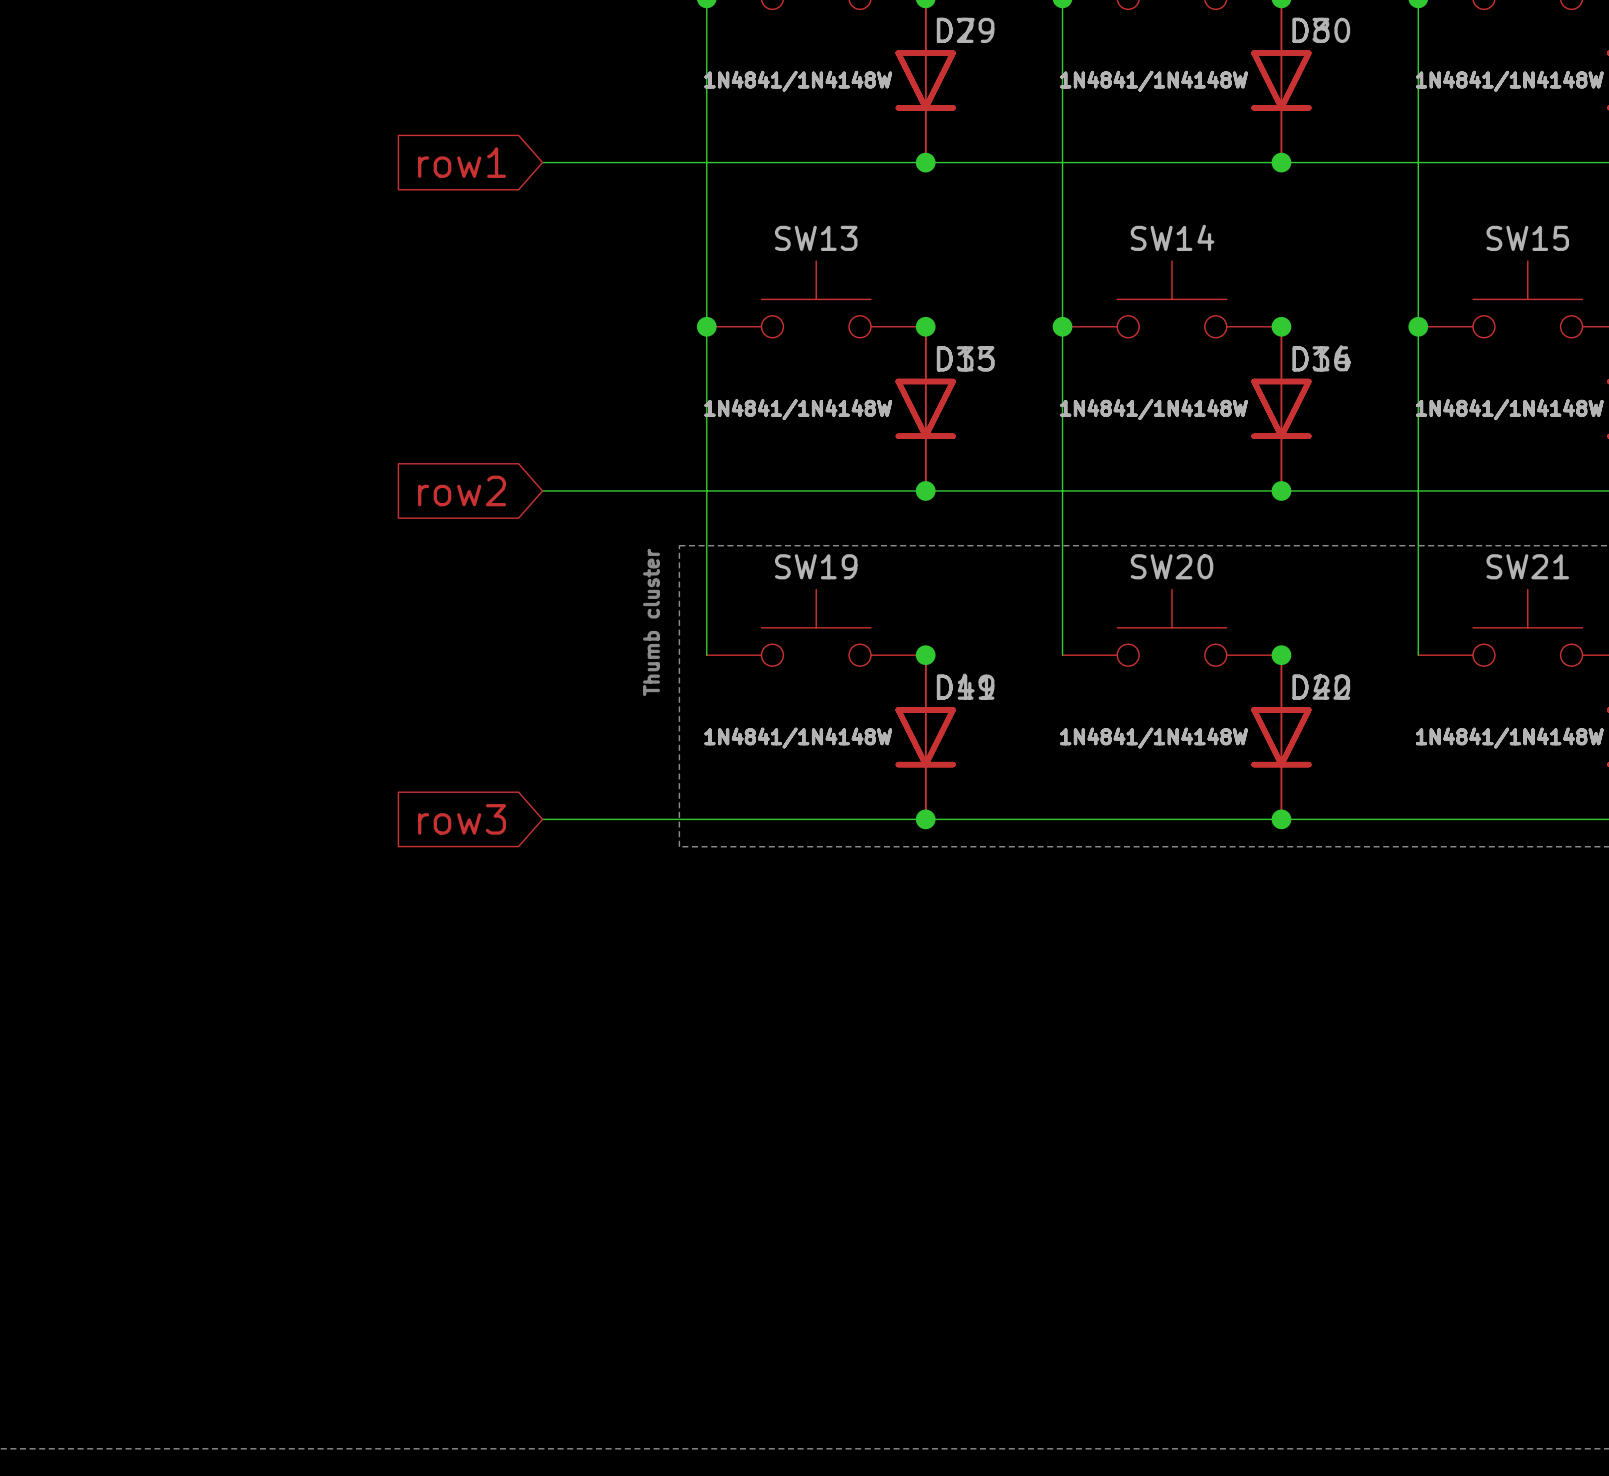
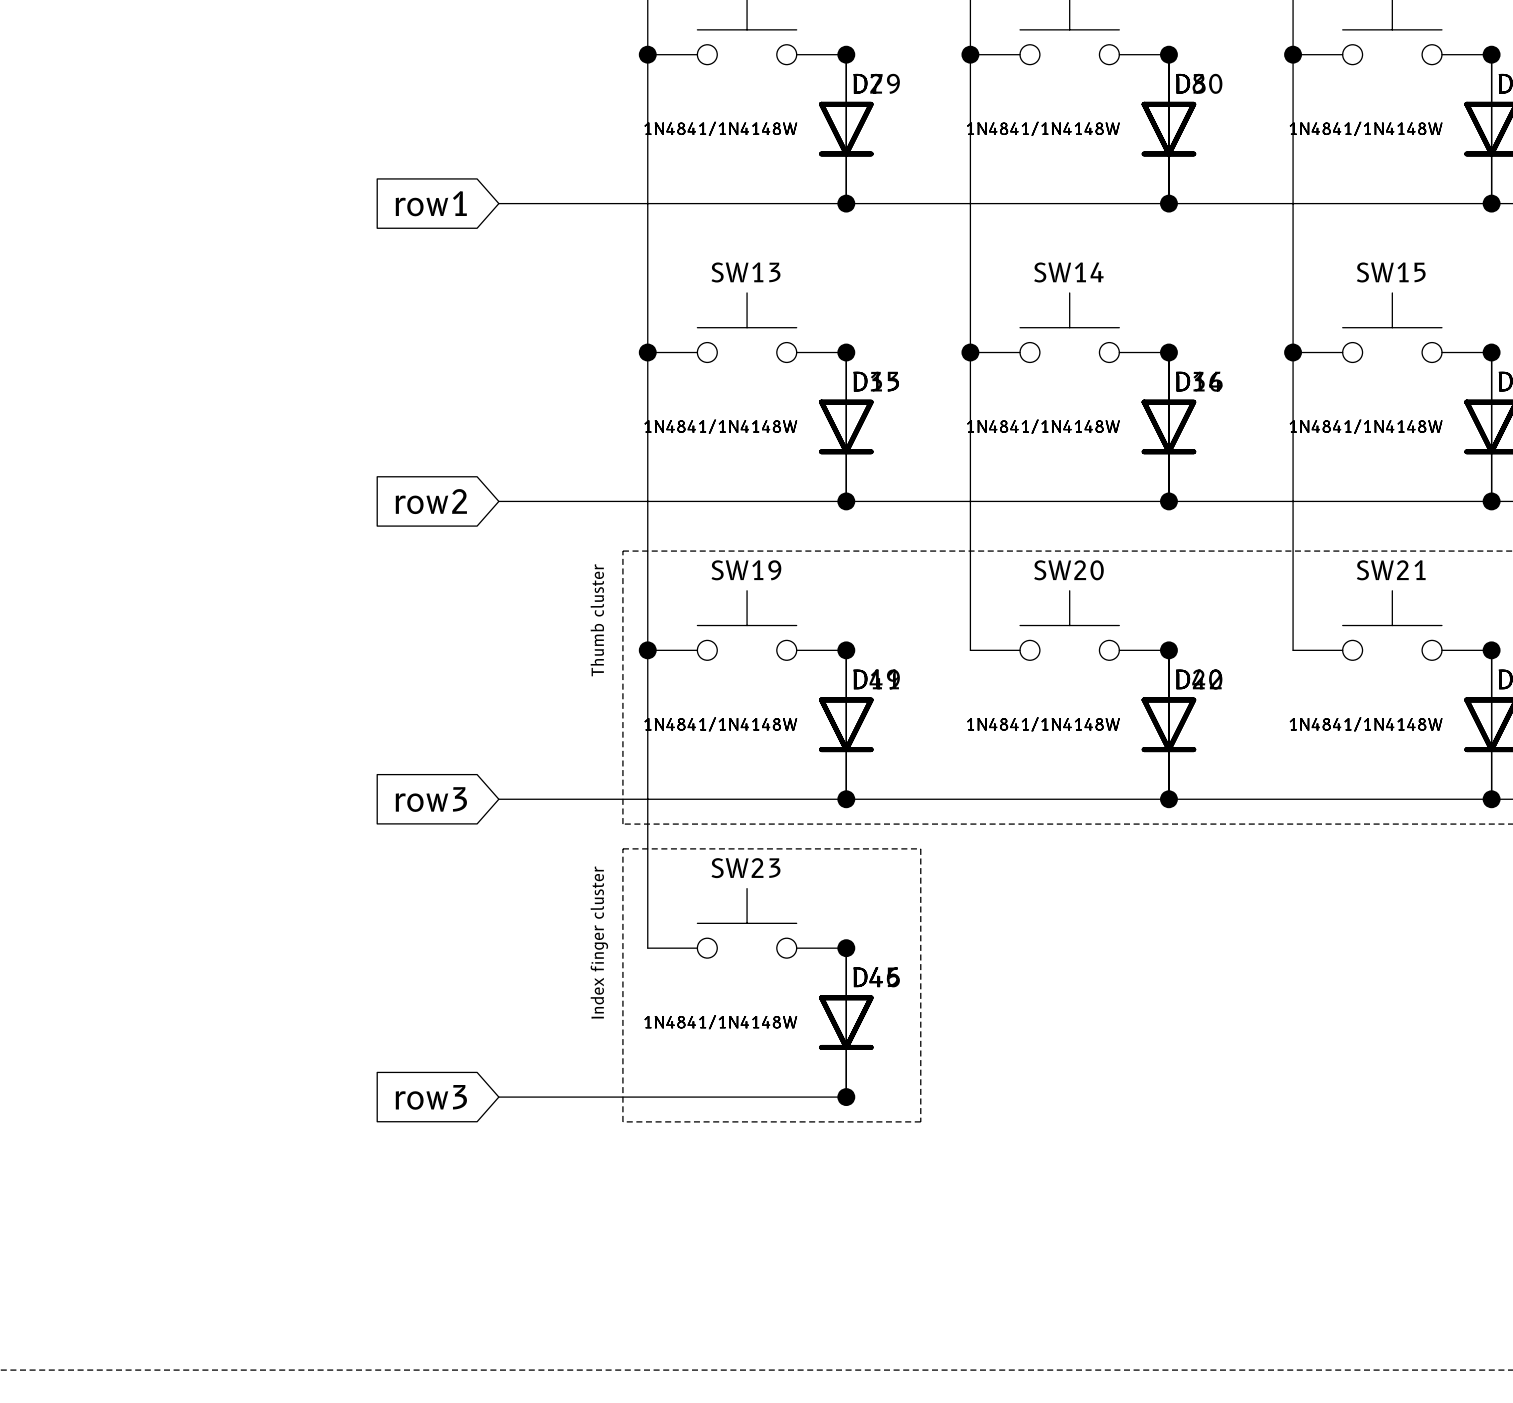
wire: none -> (647, 650) (647, 948)
junction: none -> (647, 650)
line: none -> (622, 848) (920, 848) (920, 1121) (622, 1121) (622, 848)
SW23: none -> (747, 923)
text: none -> Index finger cluster (599, 942)
junction: none -> (846, 948)
part: none -> 1N4841/1N4148W (846, 1022)
part: none -> 1N4841/1N4148W (846, 1022)
global label: none -> row3 (431, 1097)
wire: none -> (498, 1097) (846, 1097)
junction: none -> (846, 1097)

